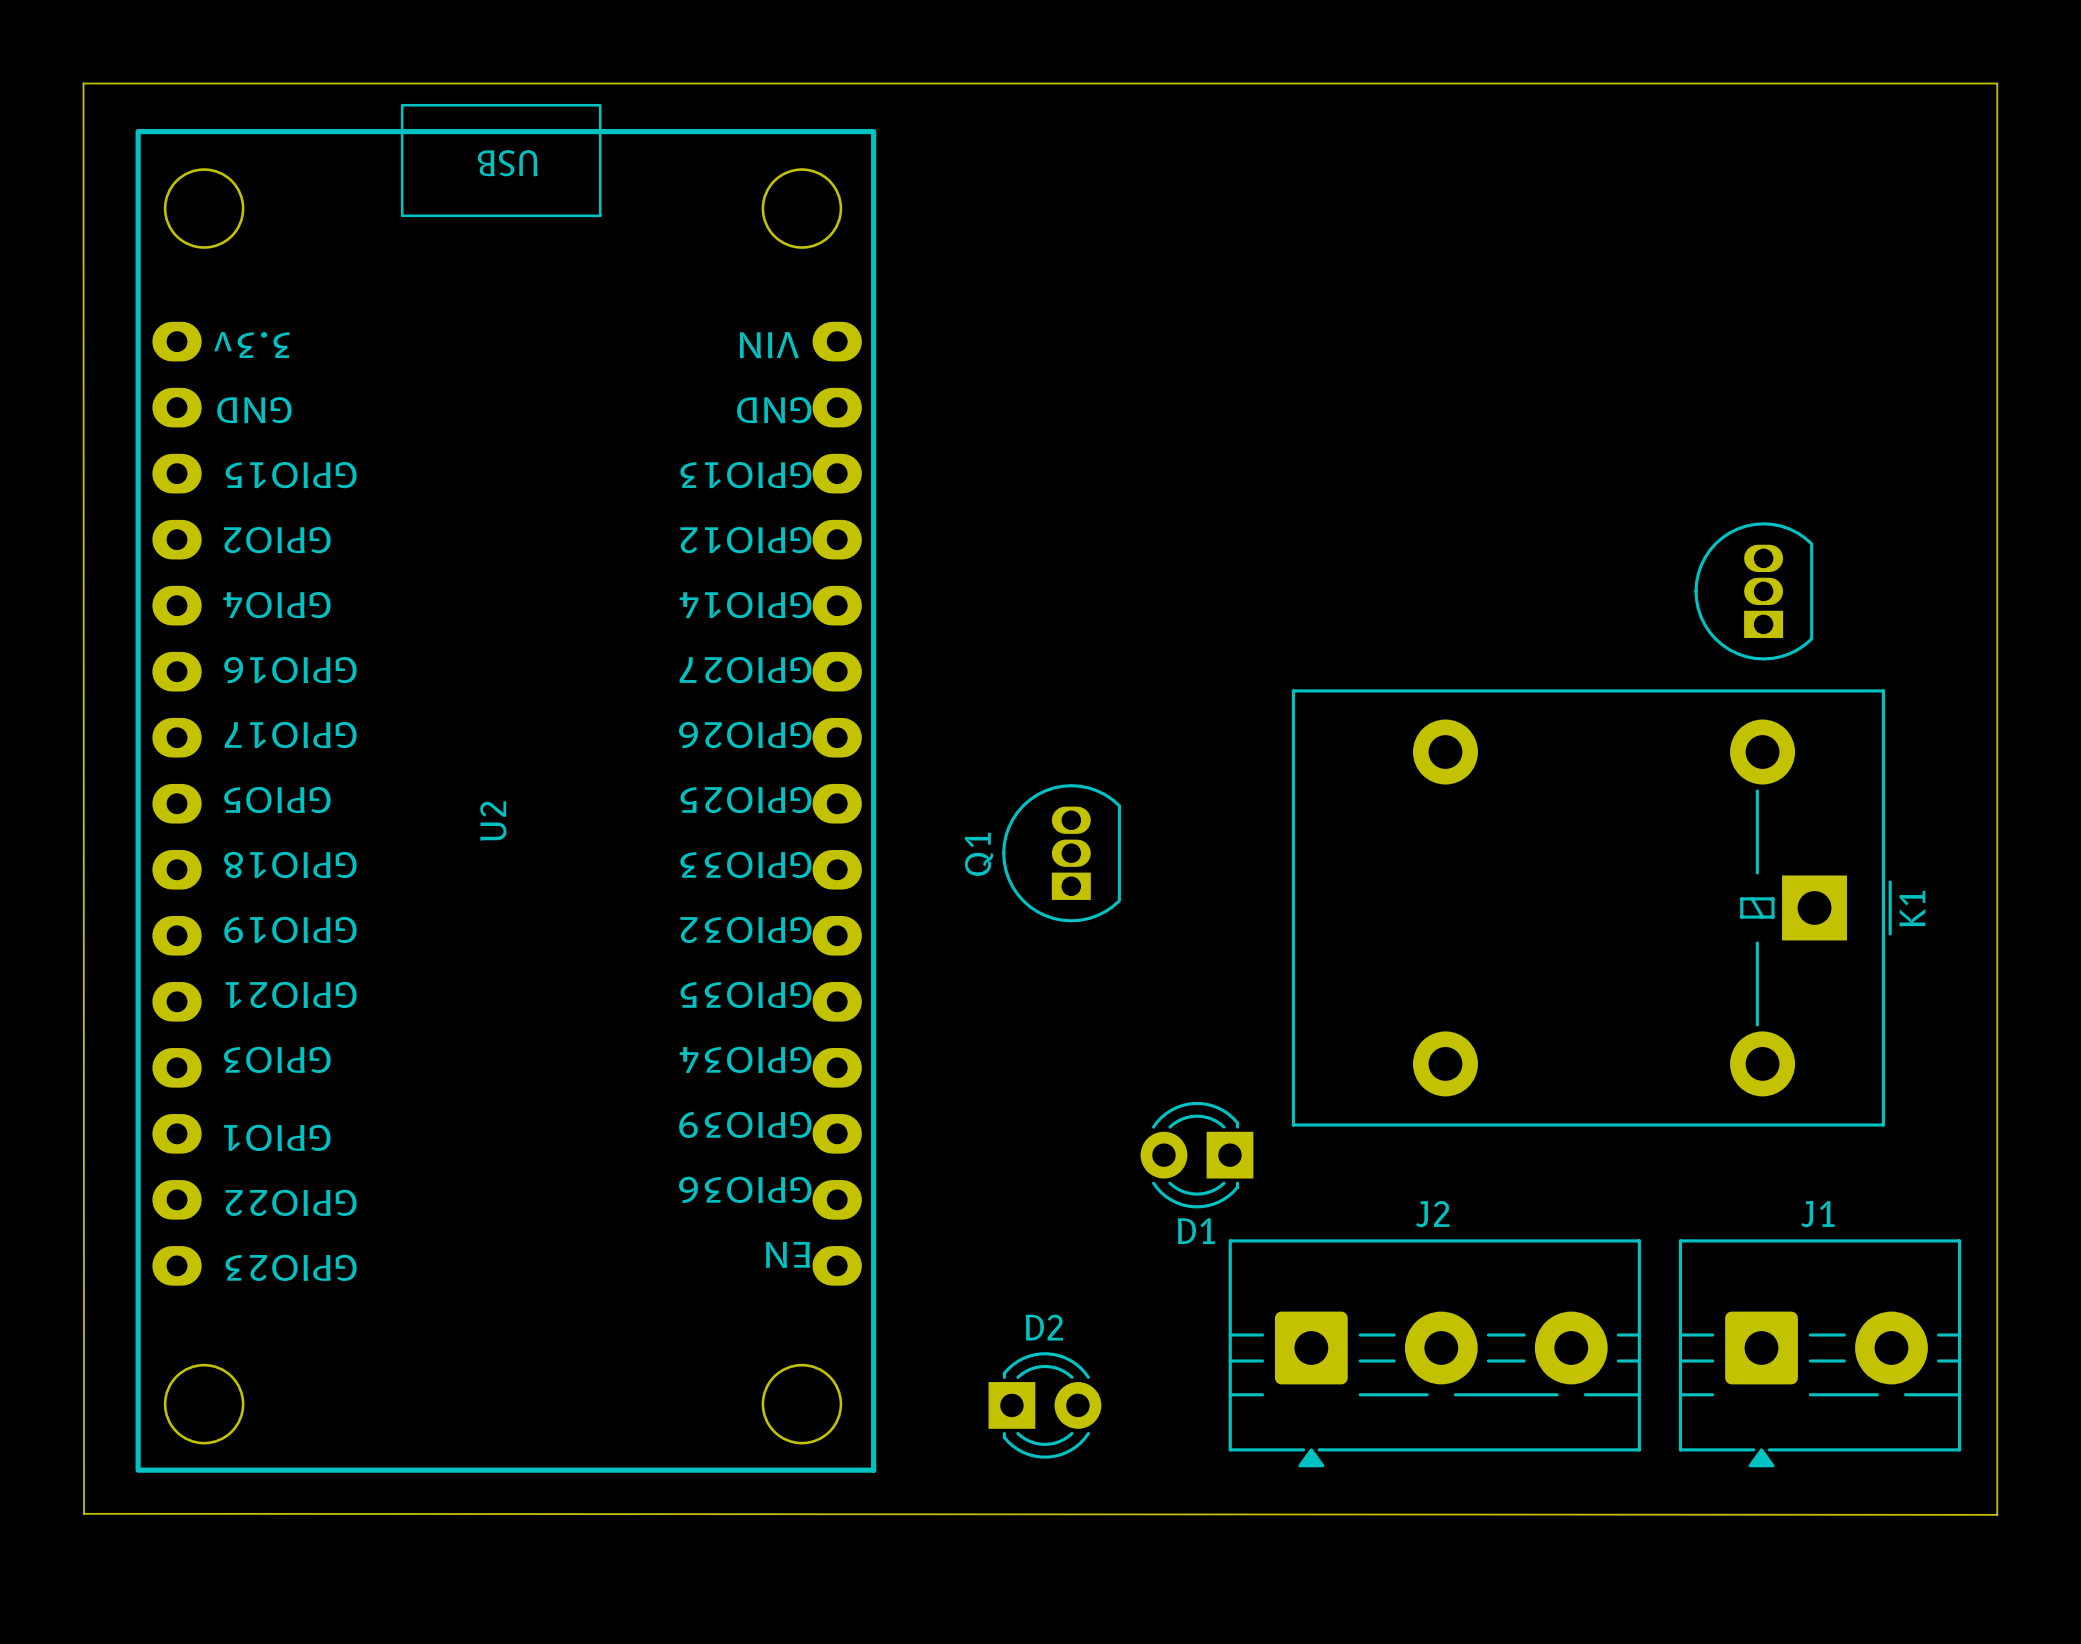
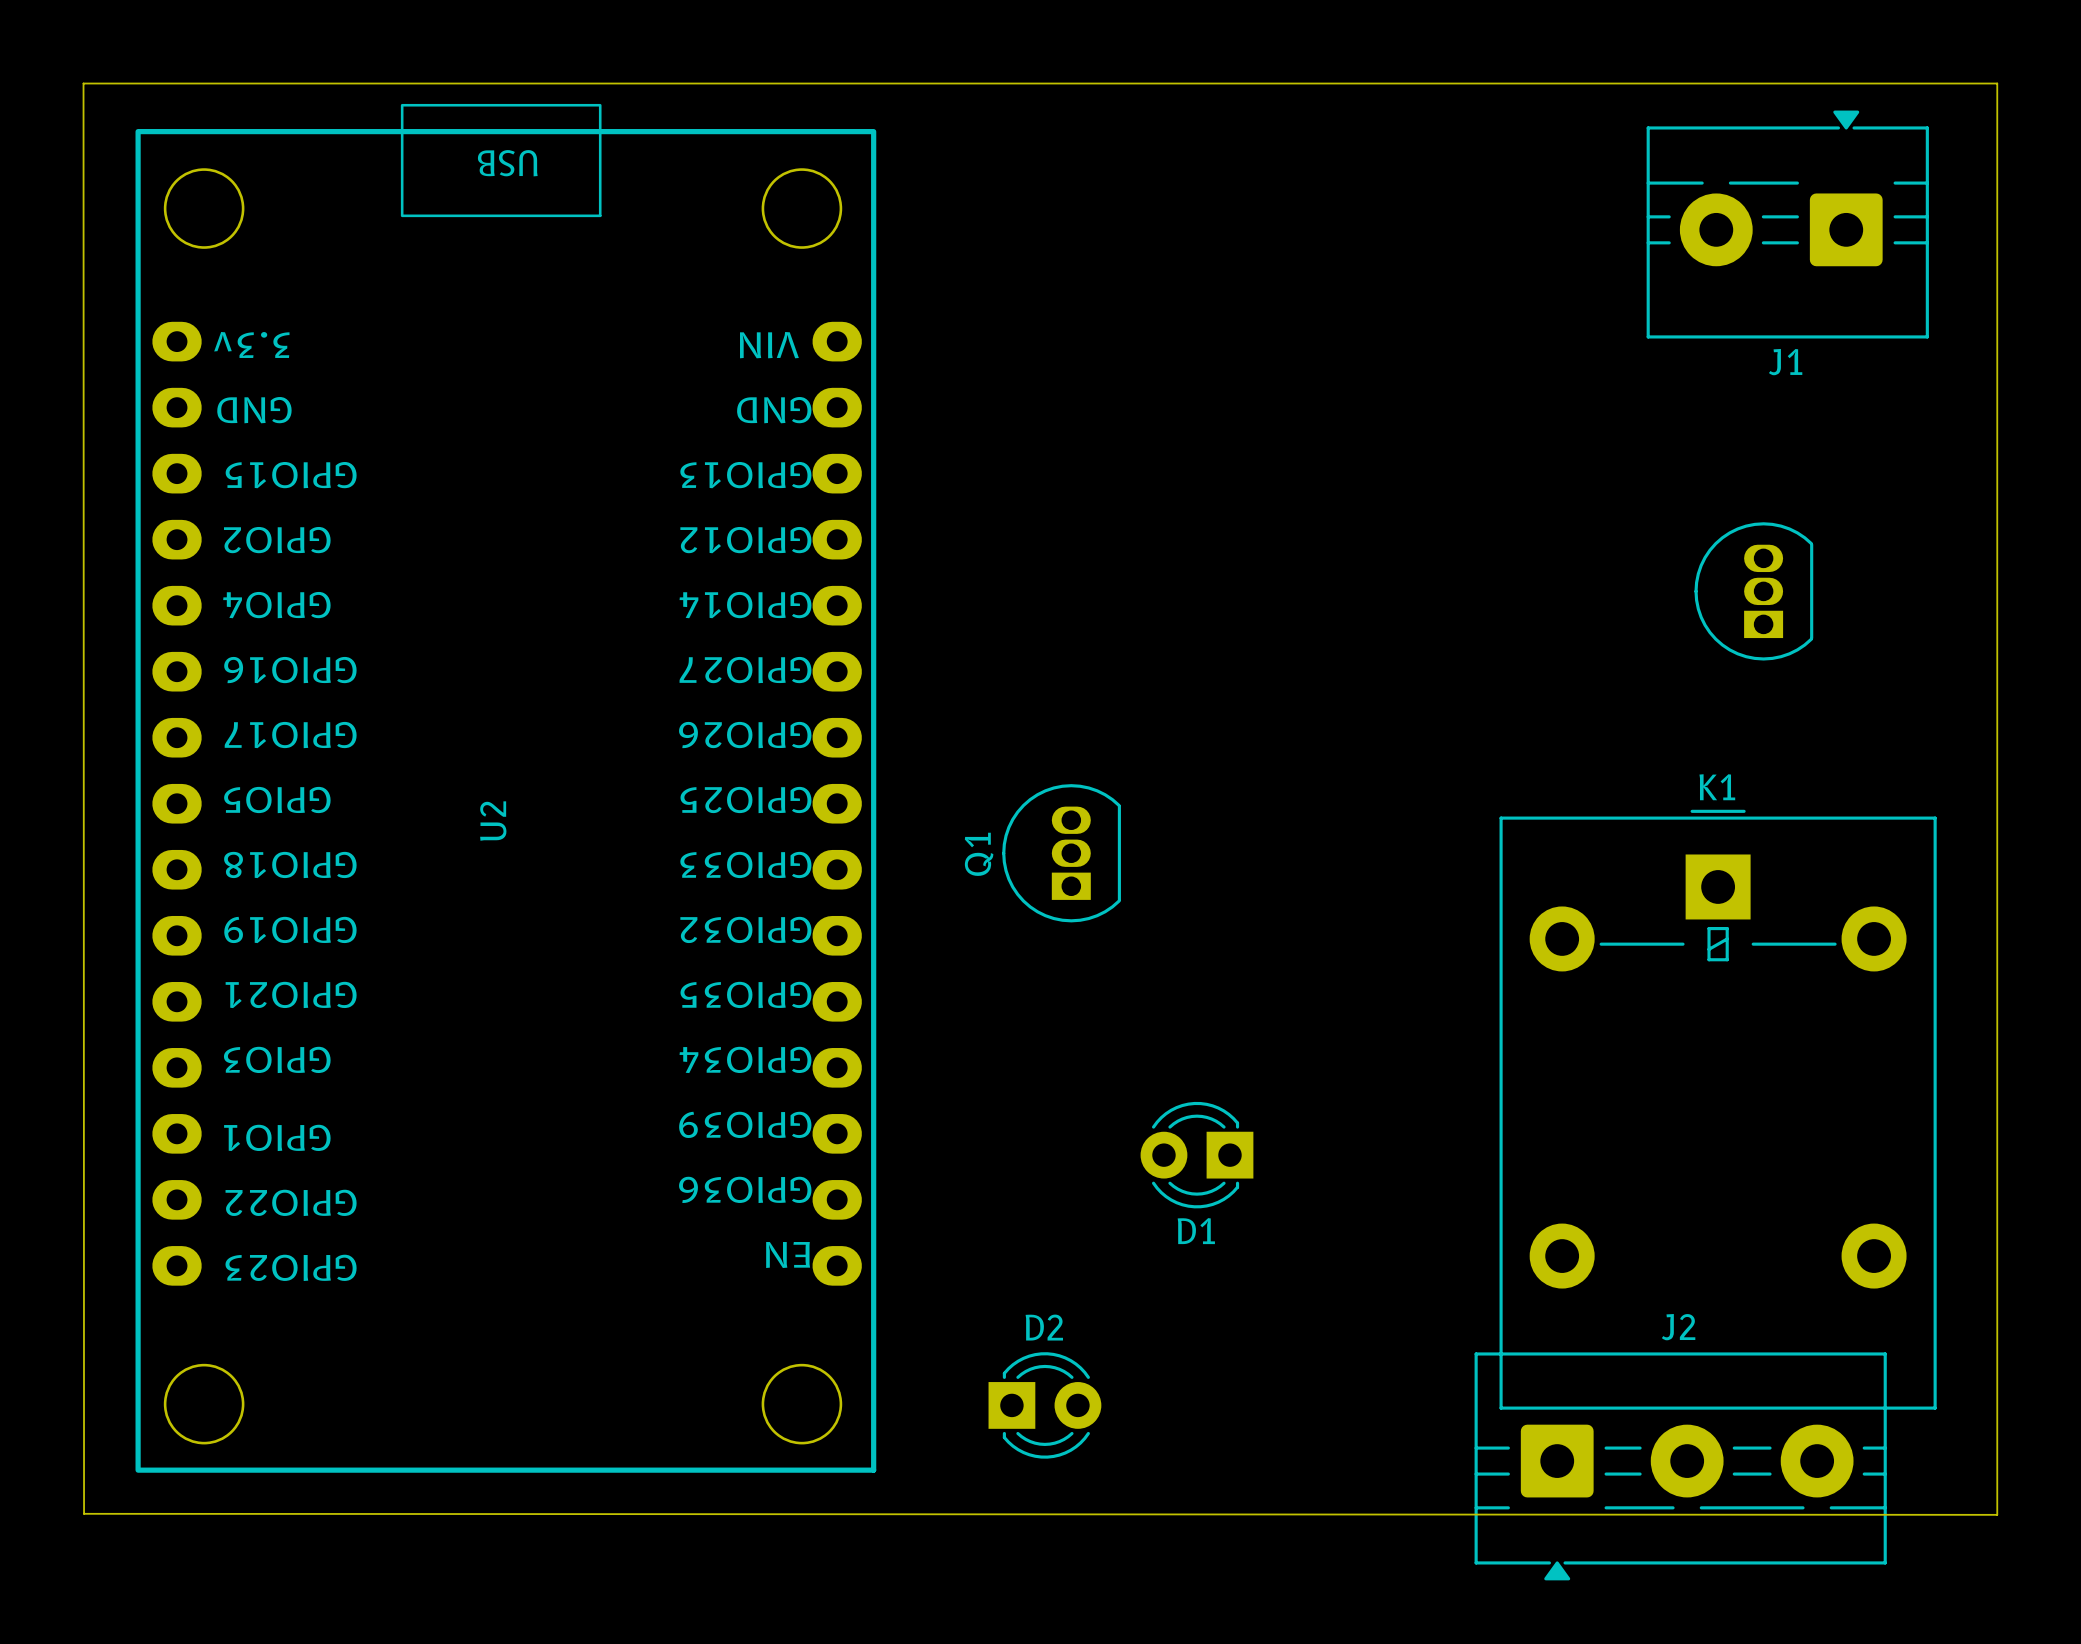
K1 rotation: 0° (1591, 907) -> 90° counterclockwise (1718, 1109)
J2 position: (1434, 1353) -> (1680, 1466)
J1 rotation: 0° (1820, 1353) -> 180° (1787, 224)
J1 position: (1820, 1353) -> (1787, 224)

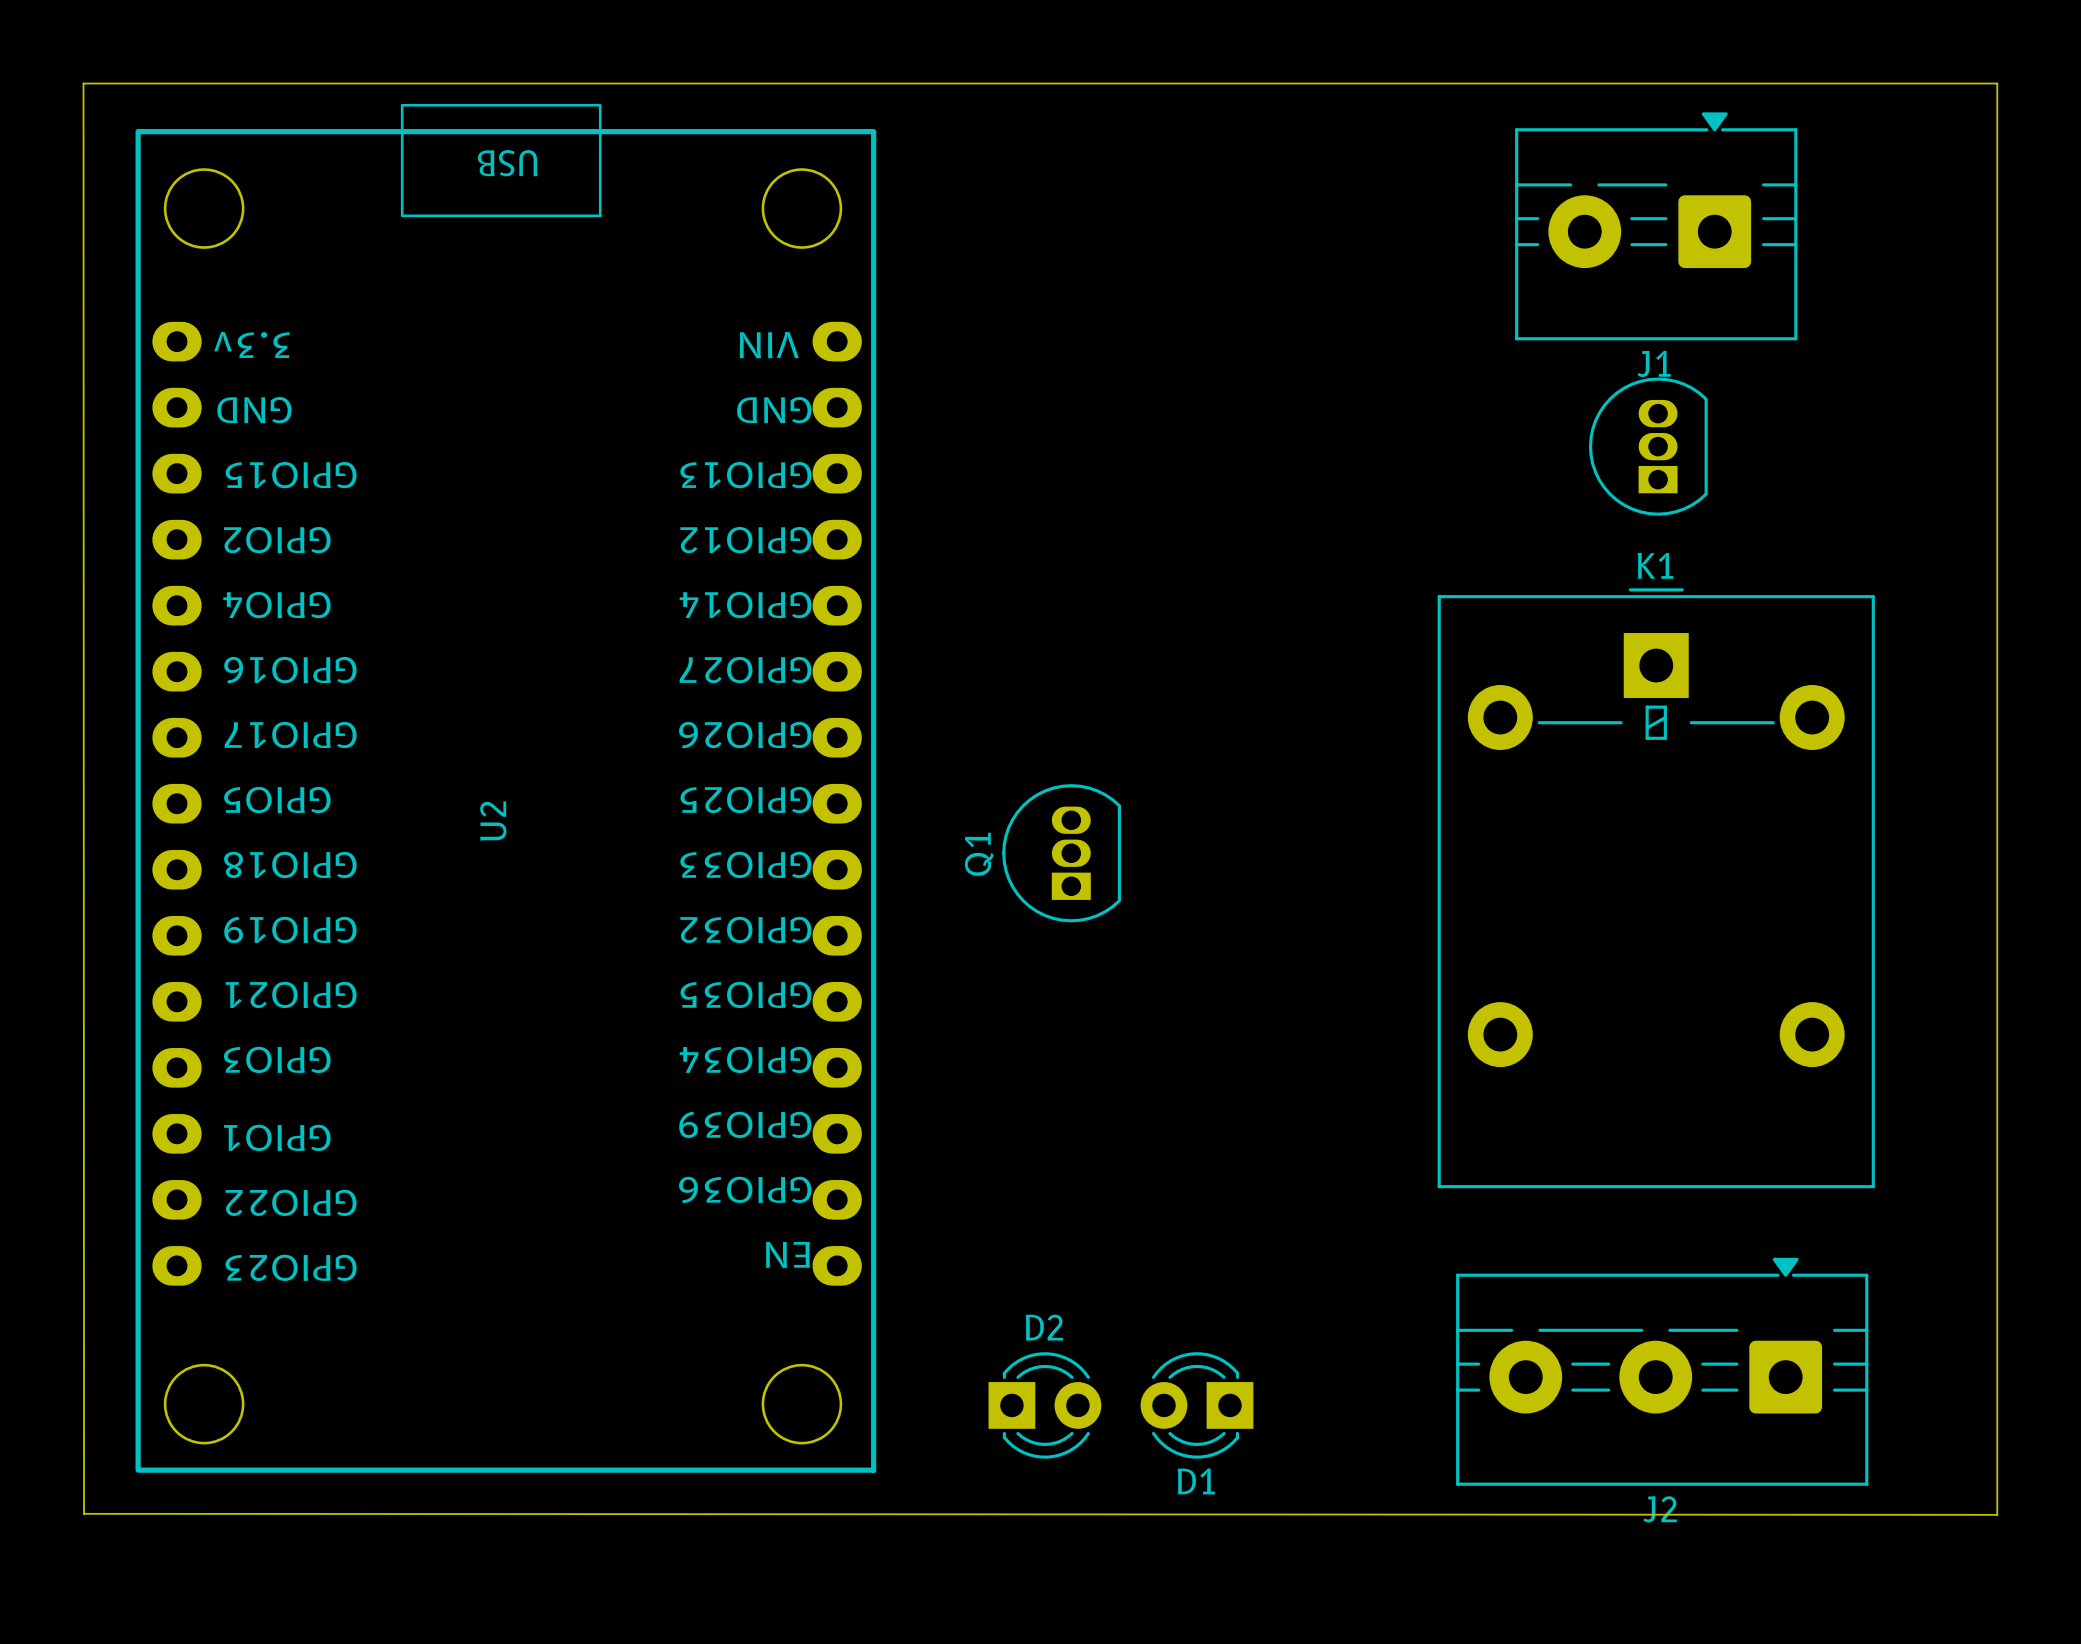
J1 position: (1787, 224) -> (1656, 226)
part position: (1753, 591) -> (1648, 446)
K1 position: (1718, 1109) -> (1656, 888)
D1 position: (1196, 1155) -> (1196, 1405)
J2 rotation: 0° (1680, 1466) -> 180° (1662, 1371)

